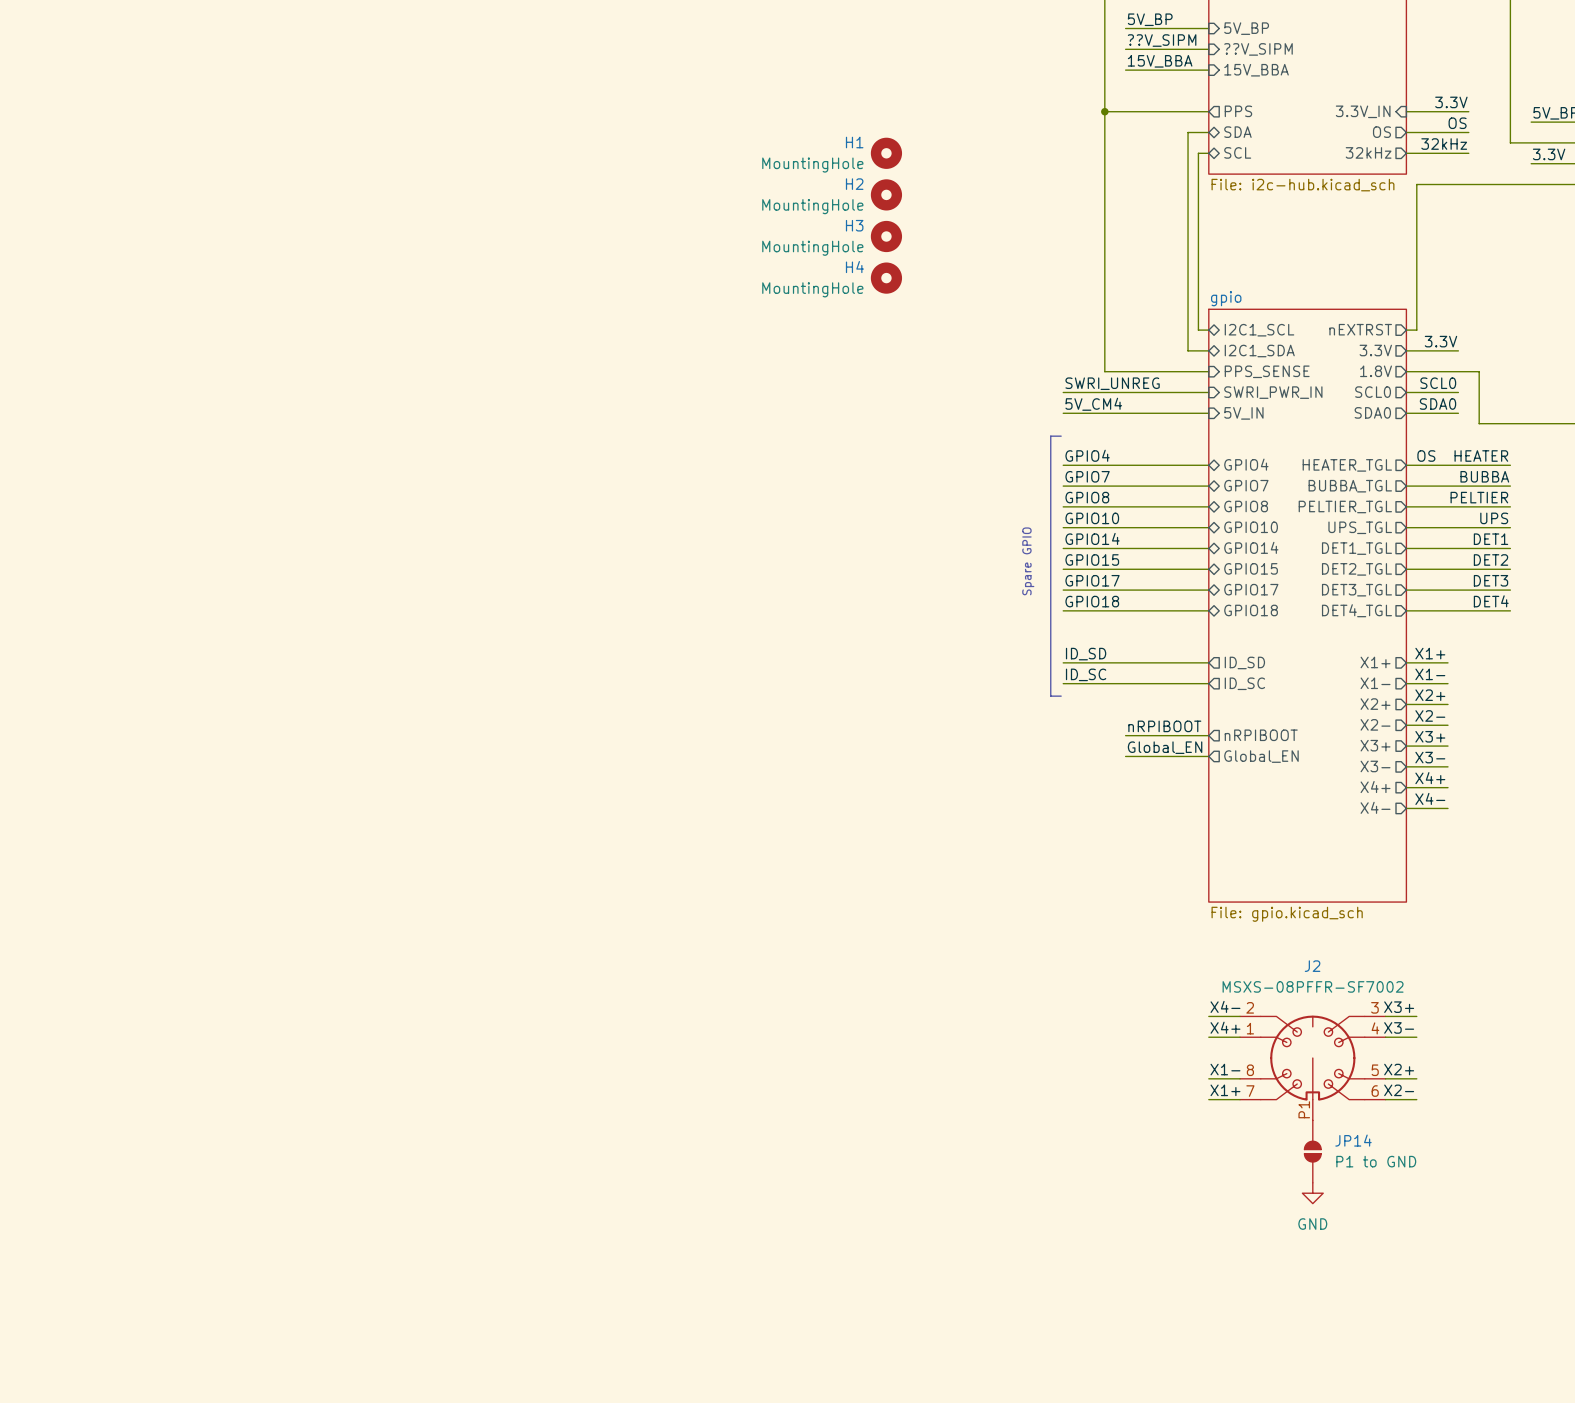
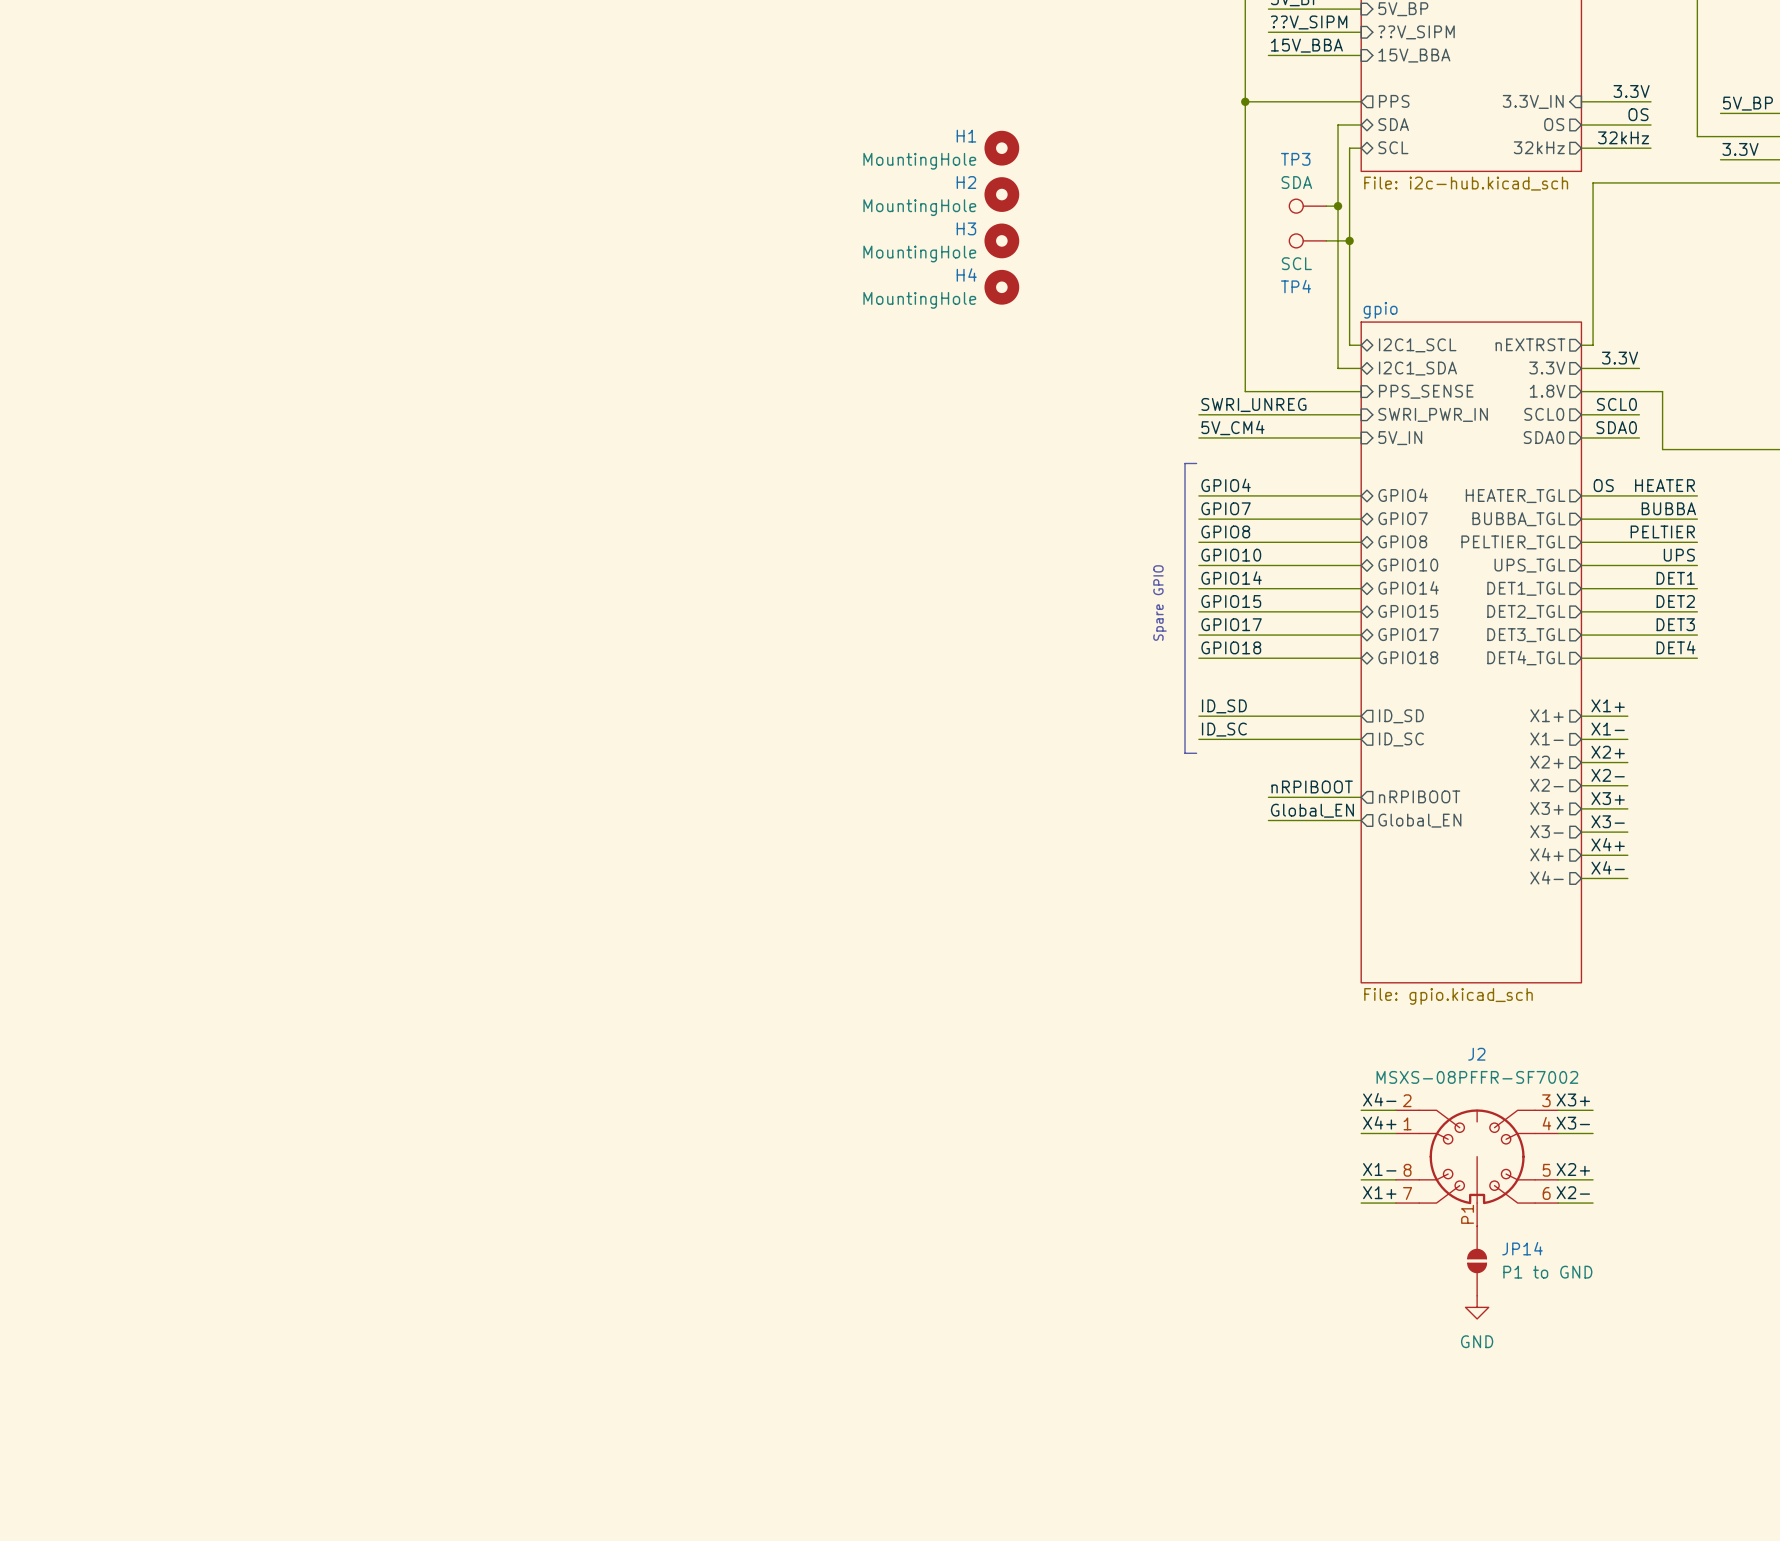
TP3: none -> SDA (1307, 206)
wire: none -> (1326, 206) (1338, 206)
junction: none -> (1338, 206)
TP4: none -> SCL (1307, 240)
wire: none -> (1326, 240) (1349, 240)
junction: none -> (1349, 240)

